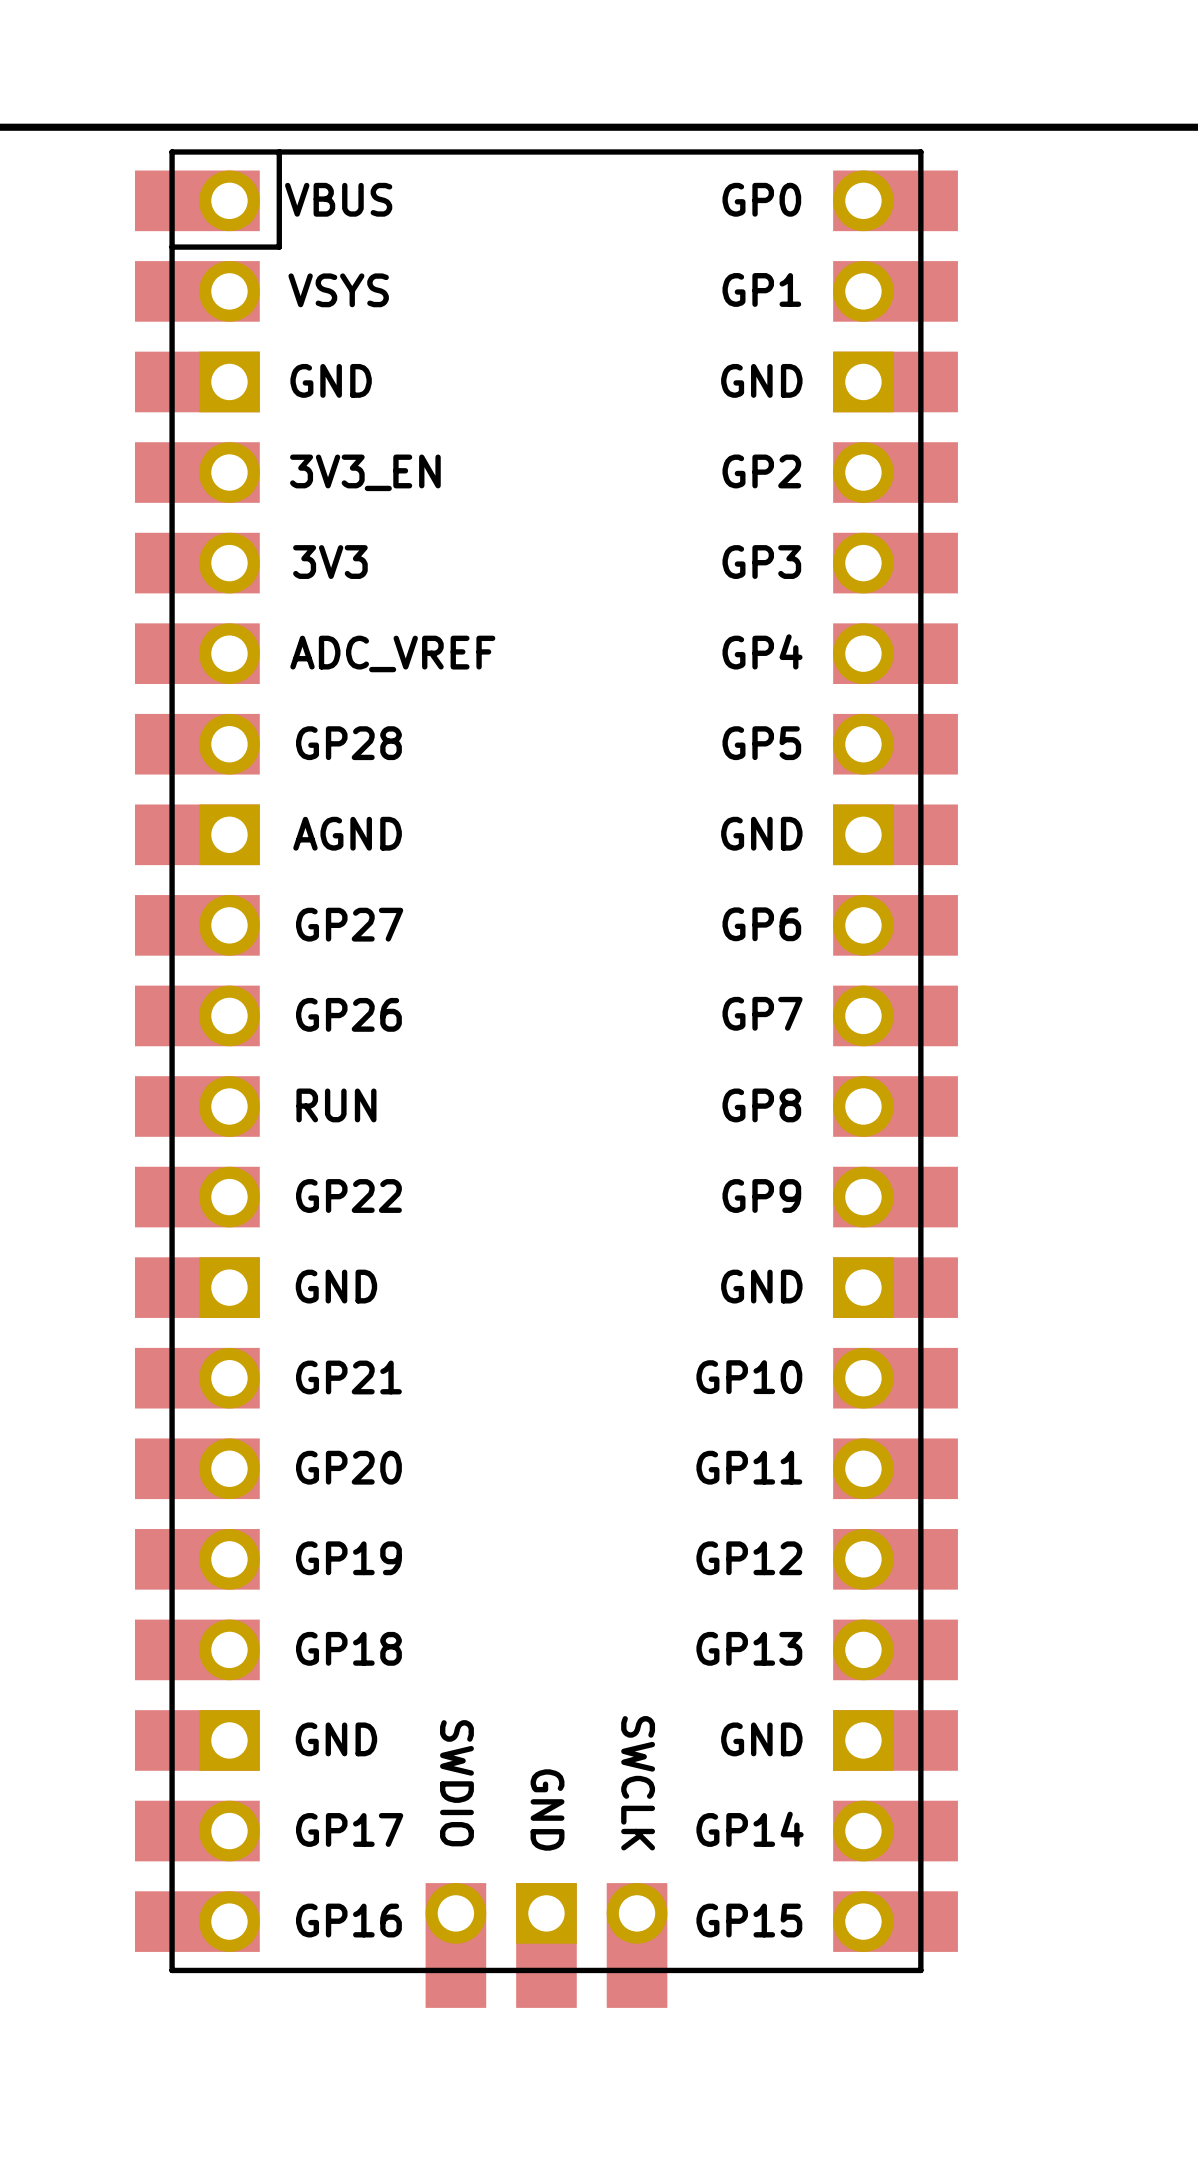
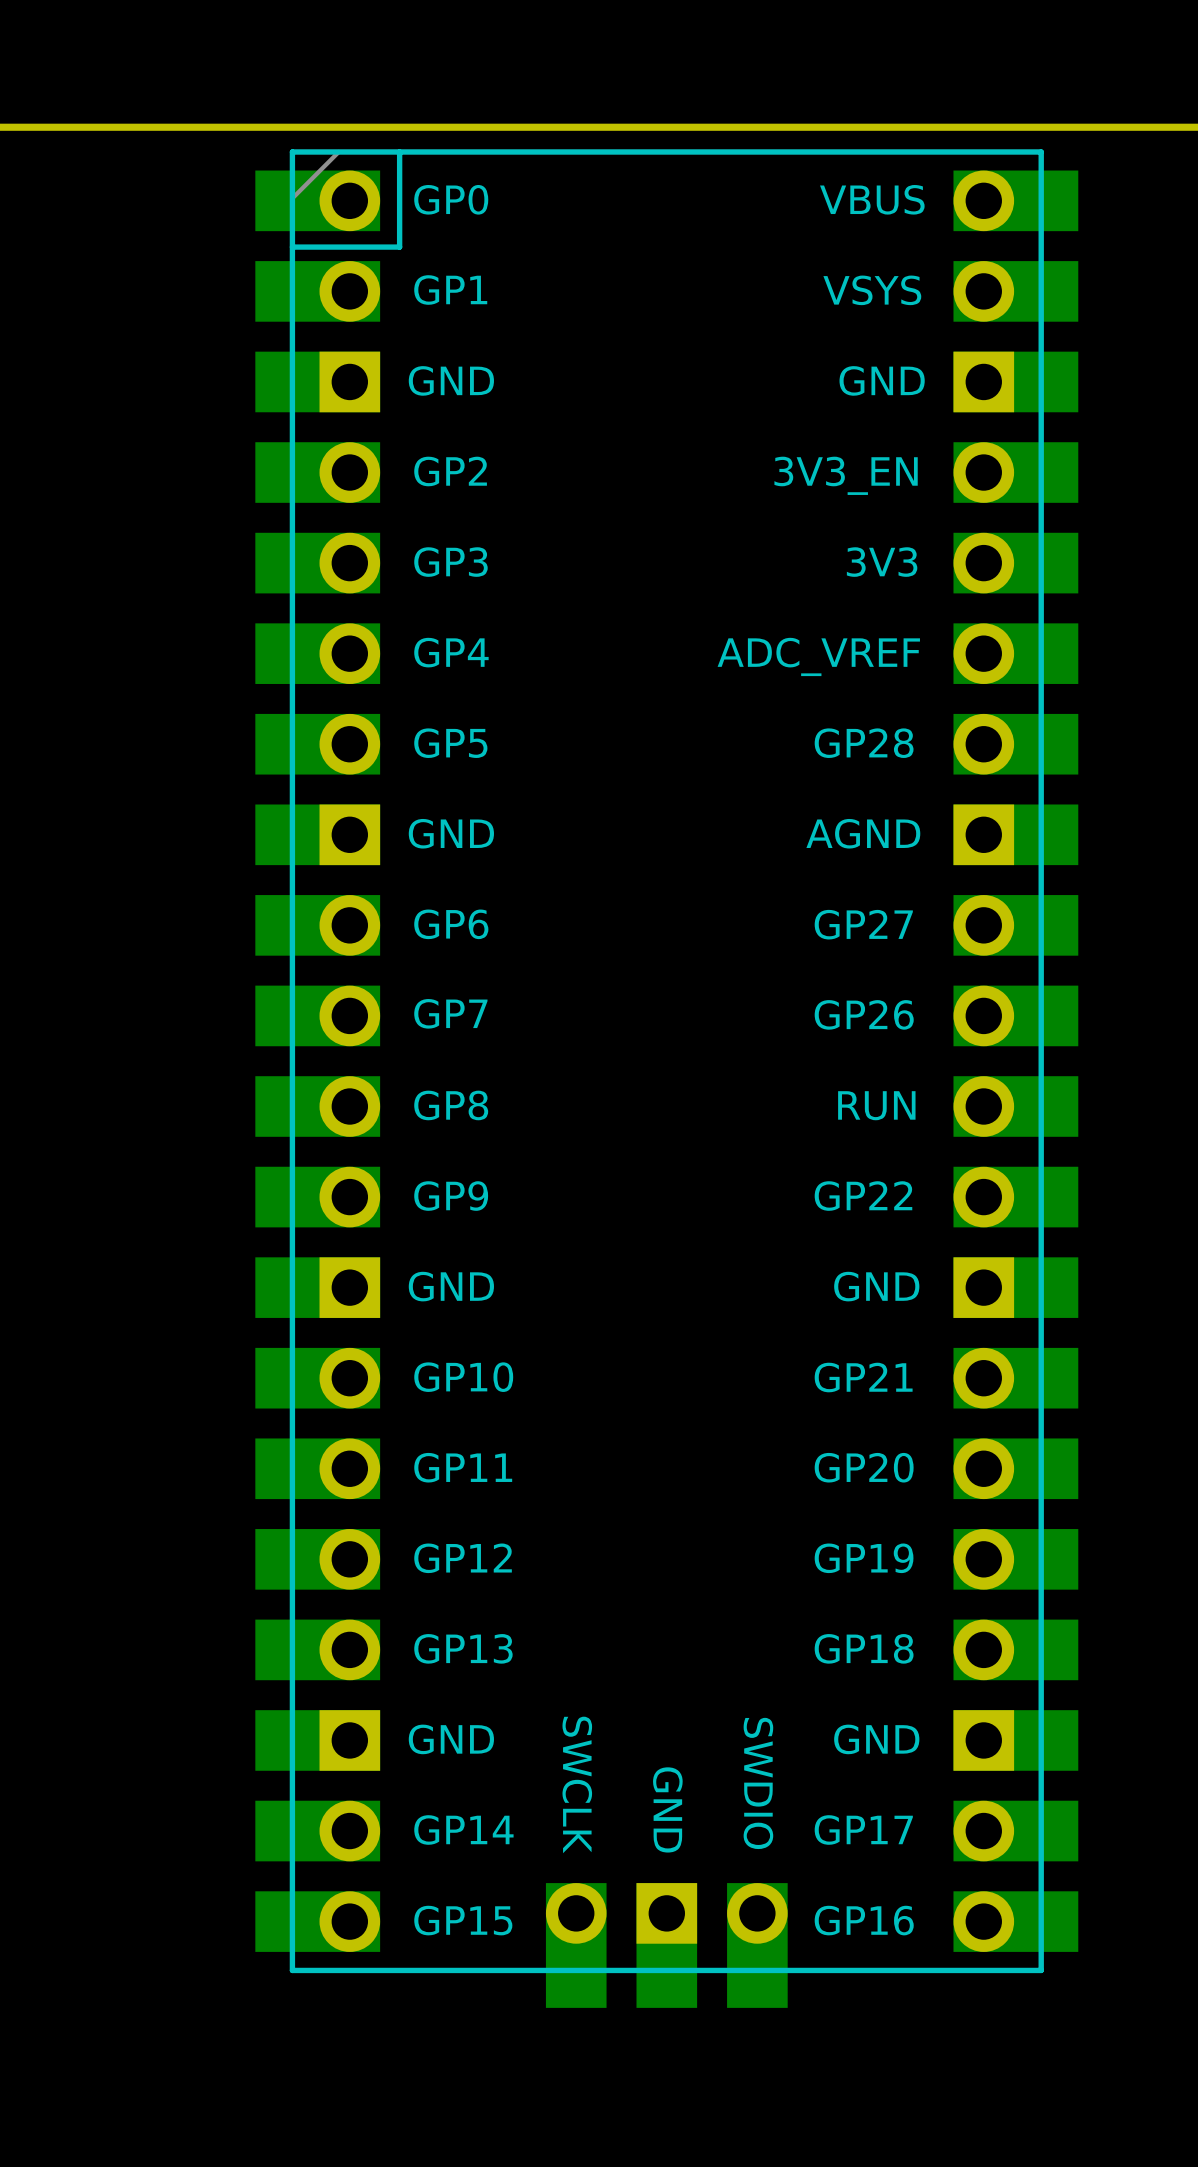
part side: top (546, 1078) -> bottom (666, 1078)

